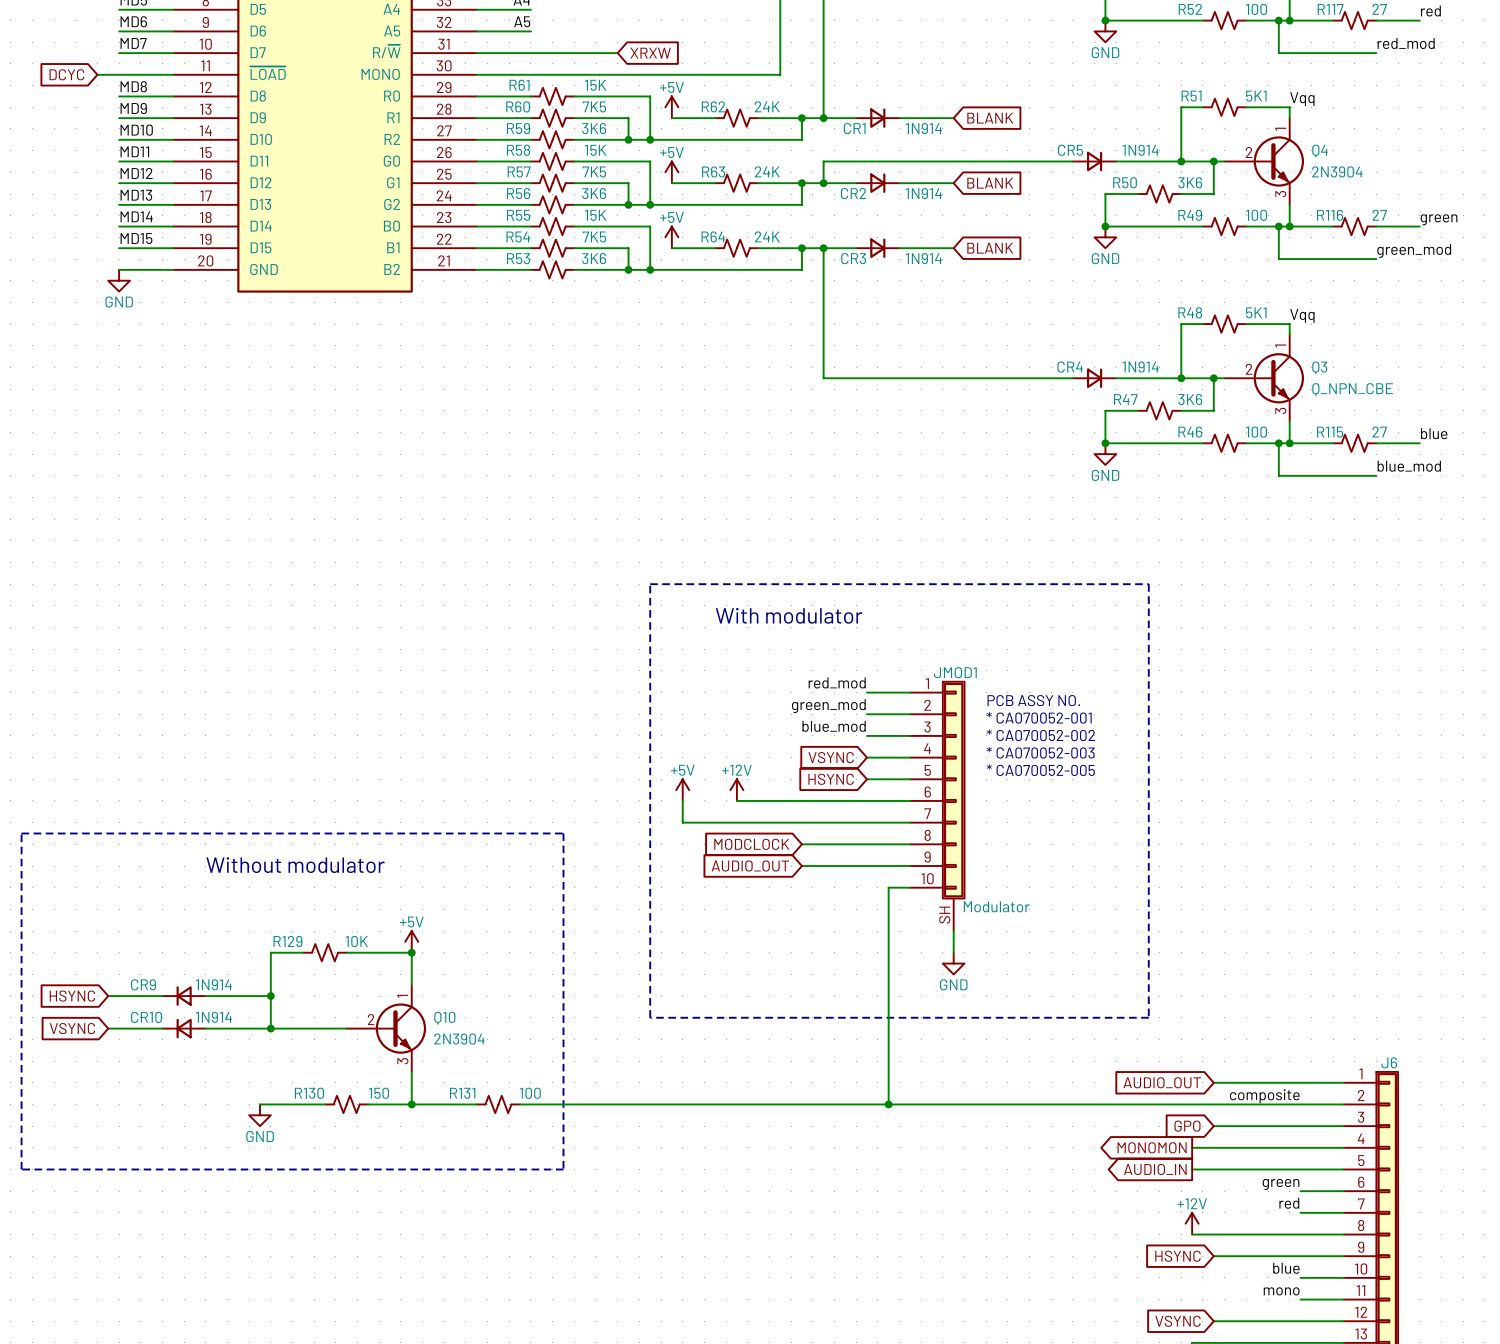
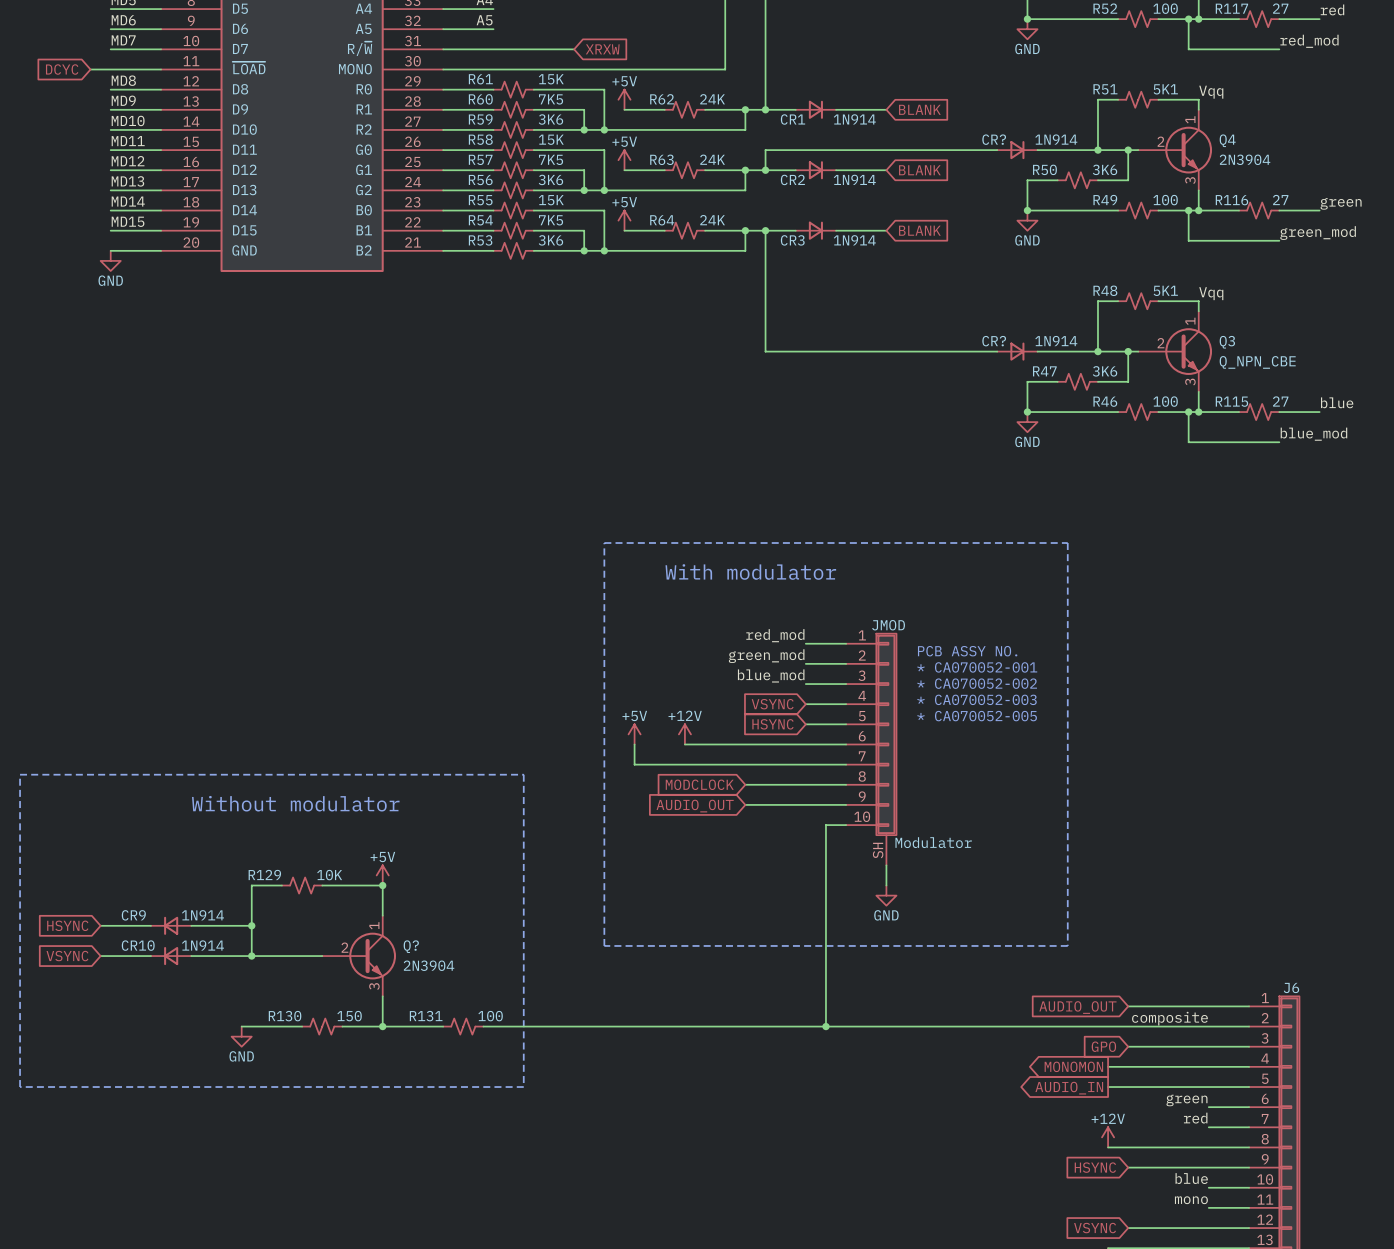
CR5 name: CR5 (1070, 150) -> CR? (994, 139)
CR4 name: CR4 (1070, 367) -> CR? (994, 341)
JMOD1 name: JMOD1 (955, 672) -> JMOD (888, 625)
Q10 name: Q10 (444, 1018) -> Q? (411, 946)

